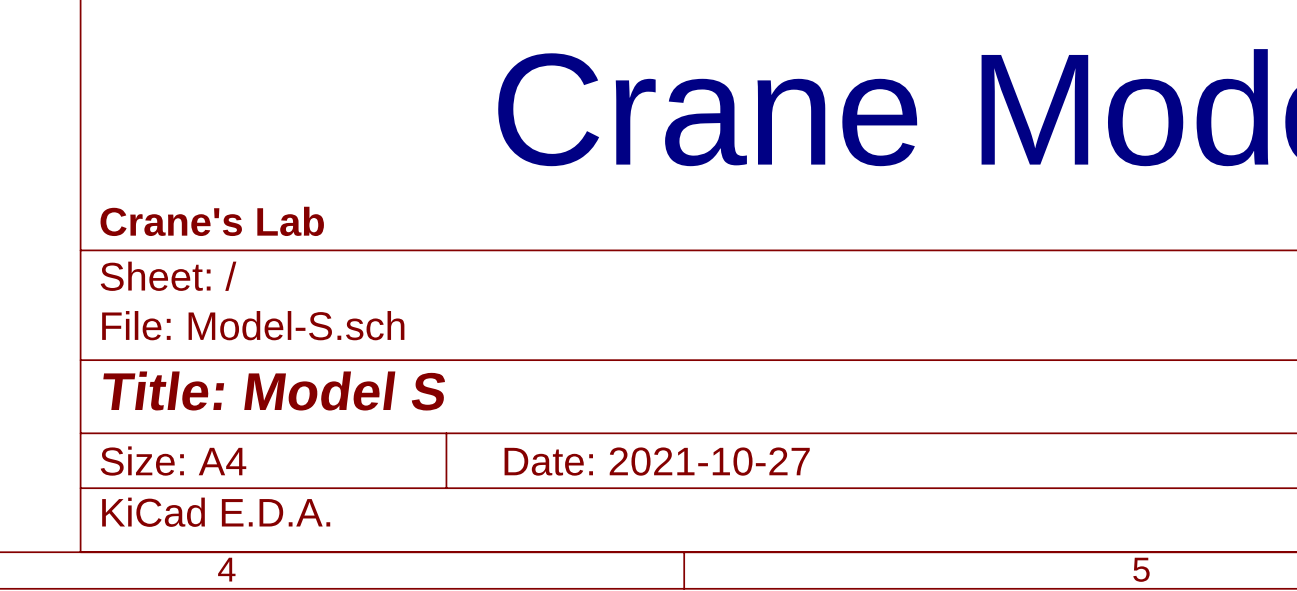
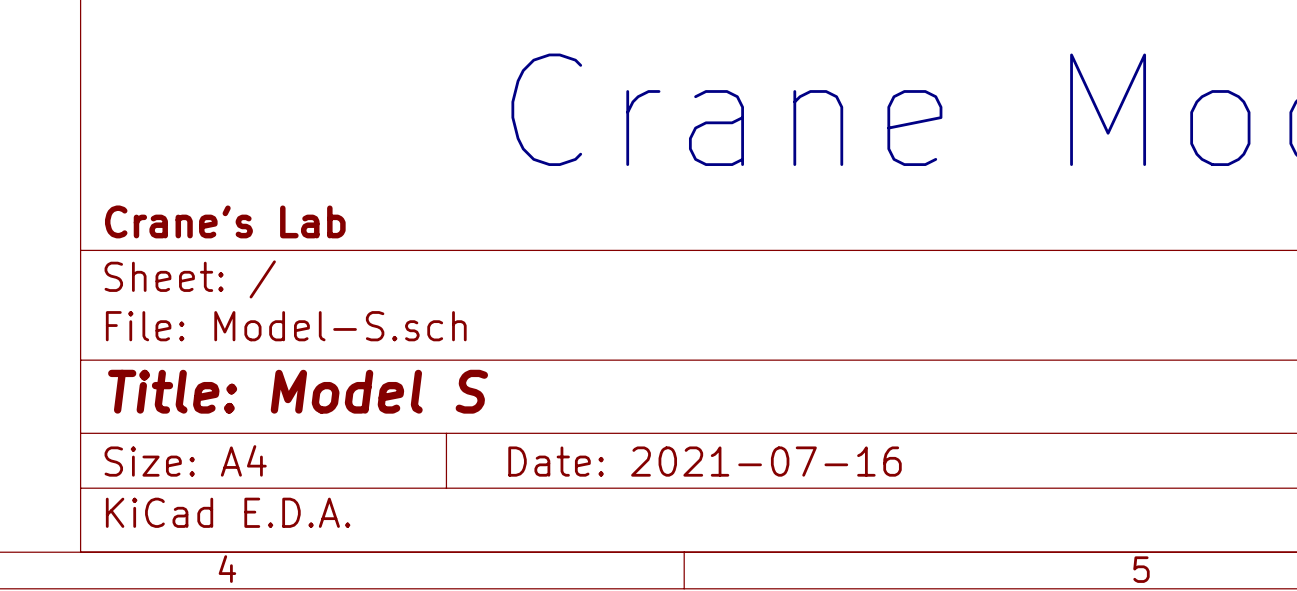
title block: Date: 2021-10-27 (657, 461) -> Date: 2021-07-16 (705, 461)

